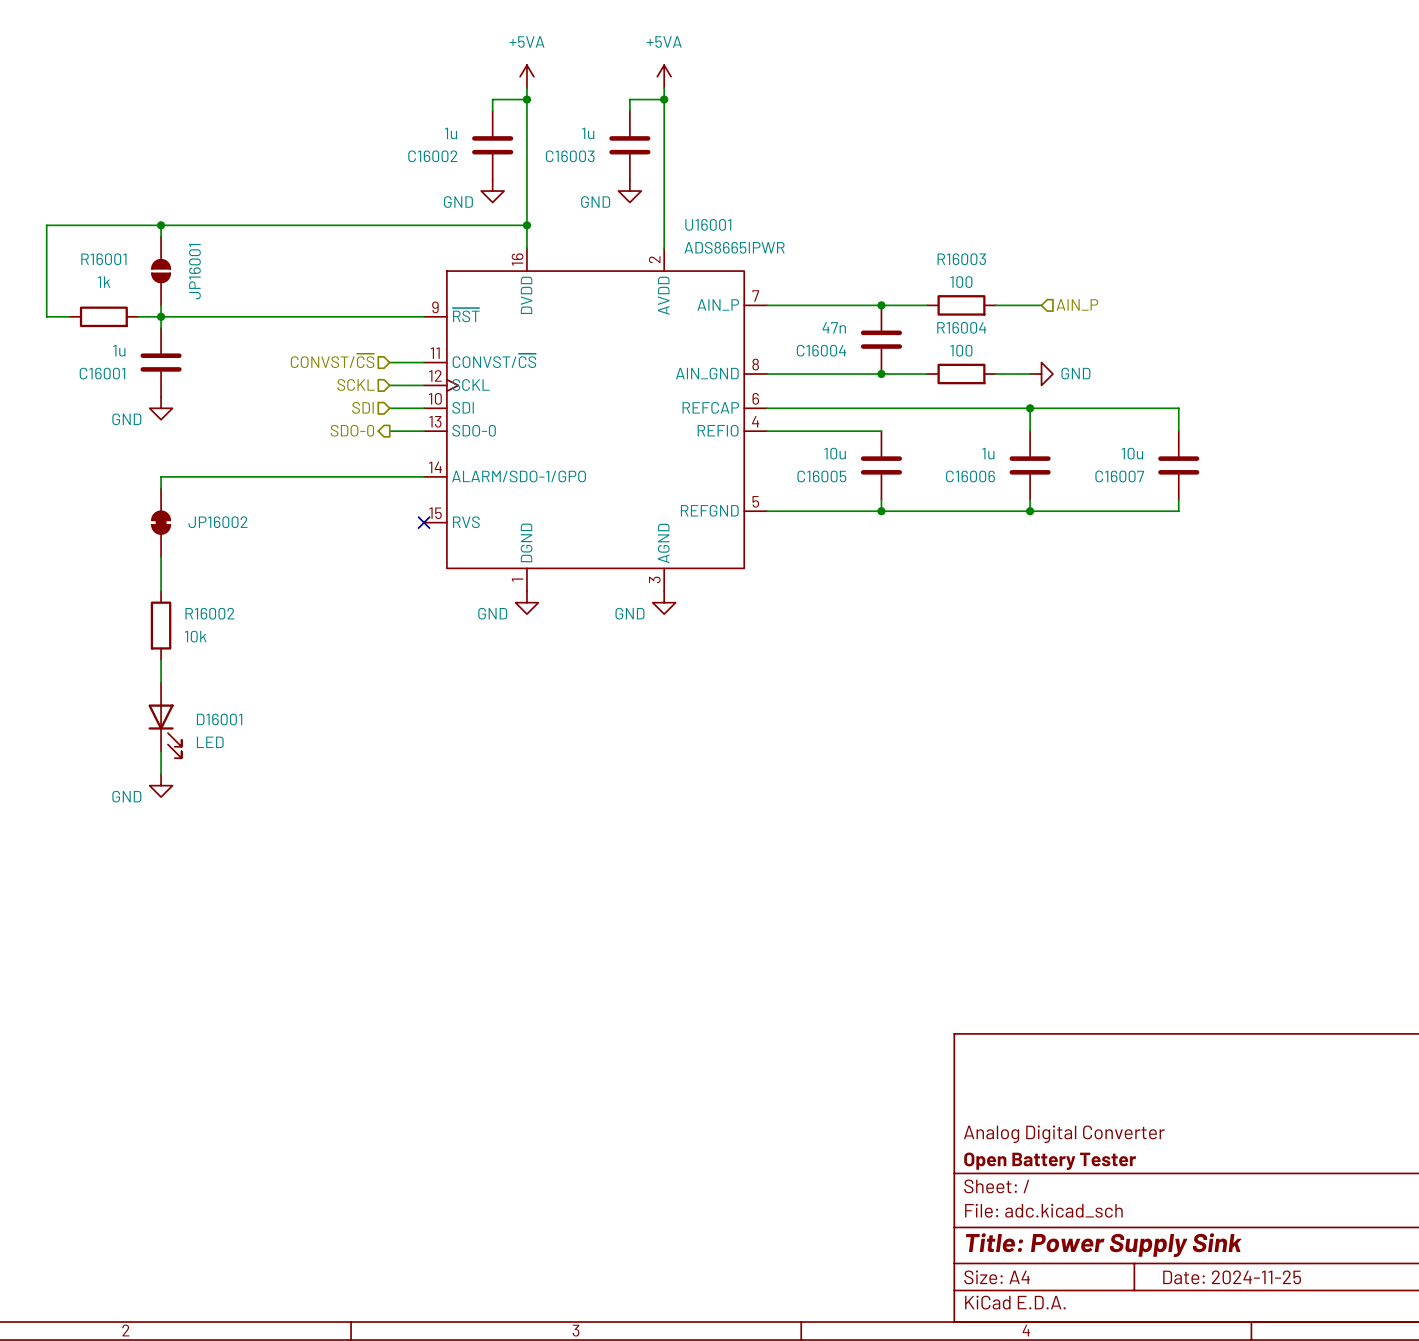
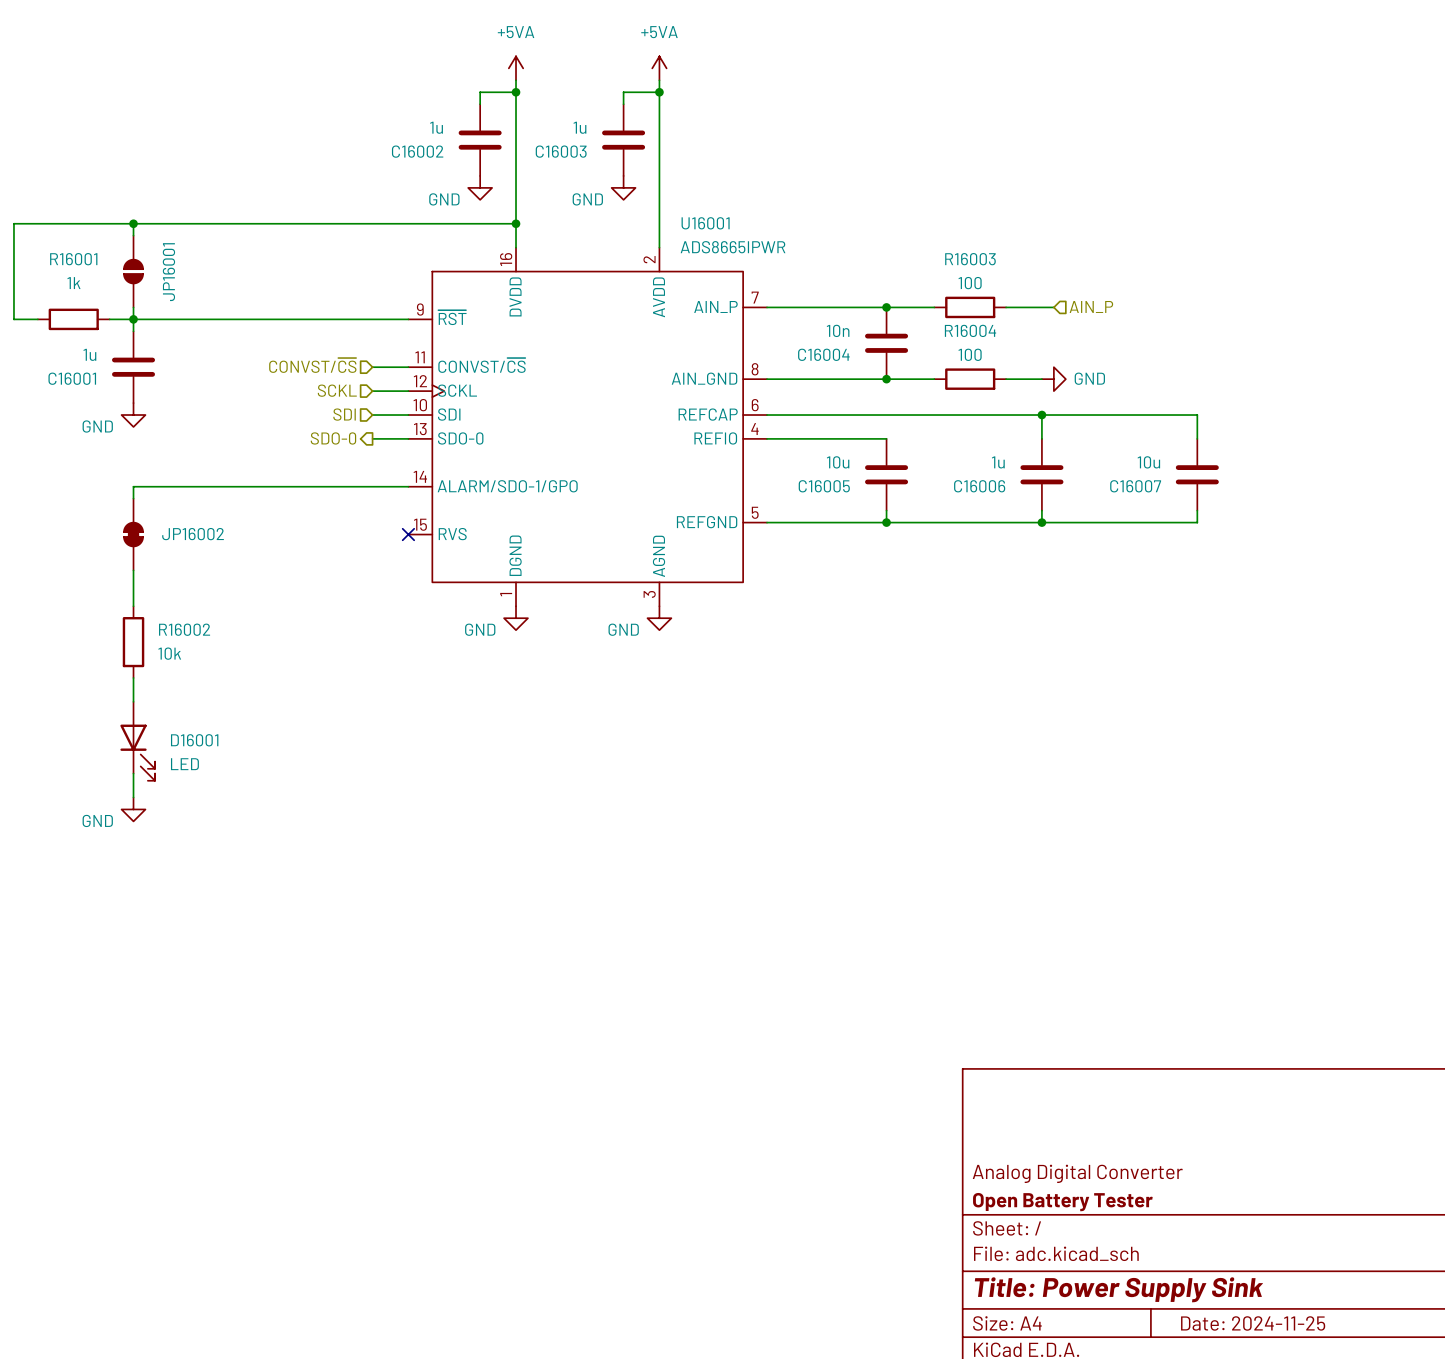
C16004 value: 47n (834, 327) -> 10n (838, 330)

